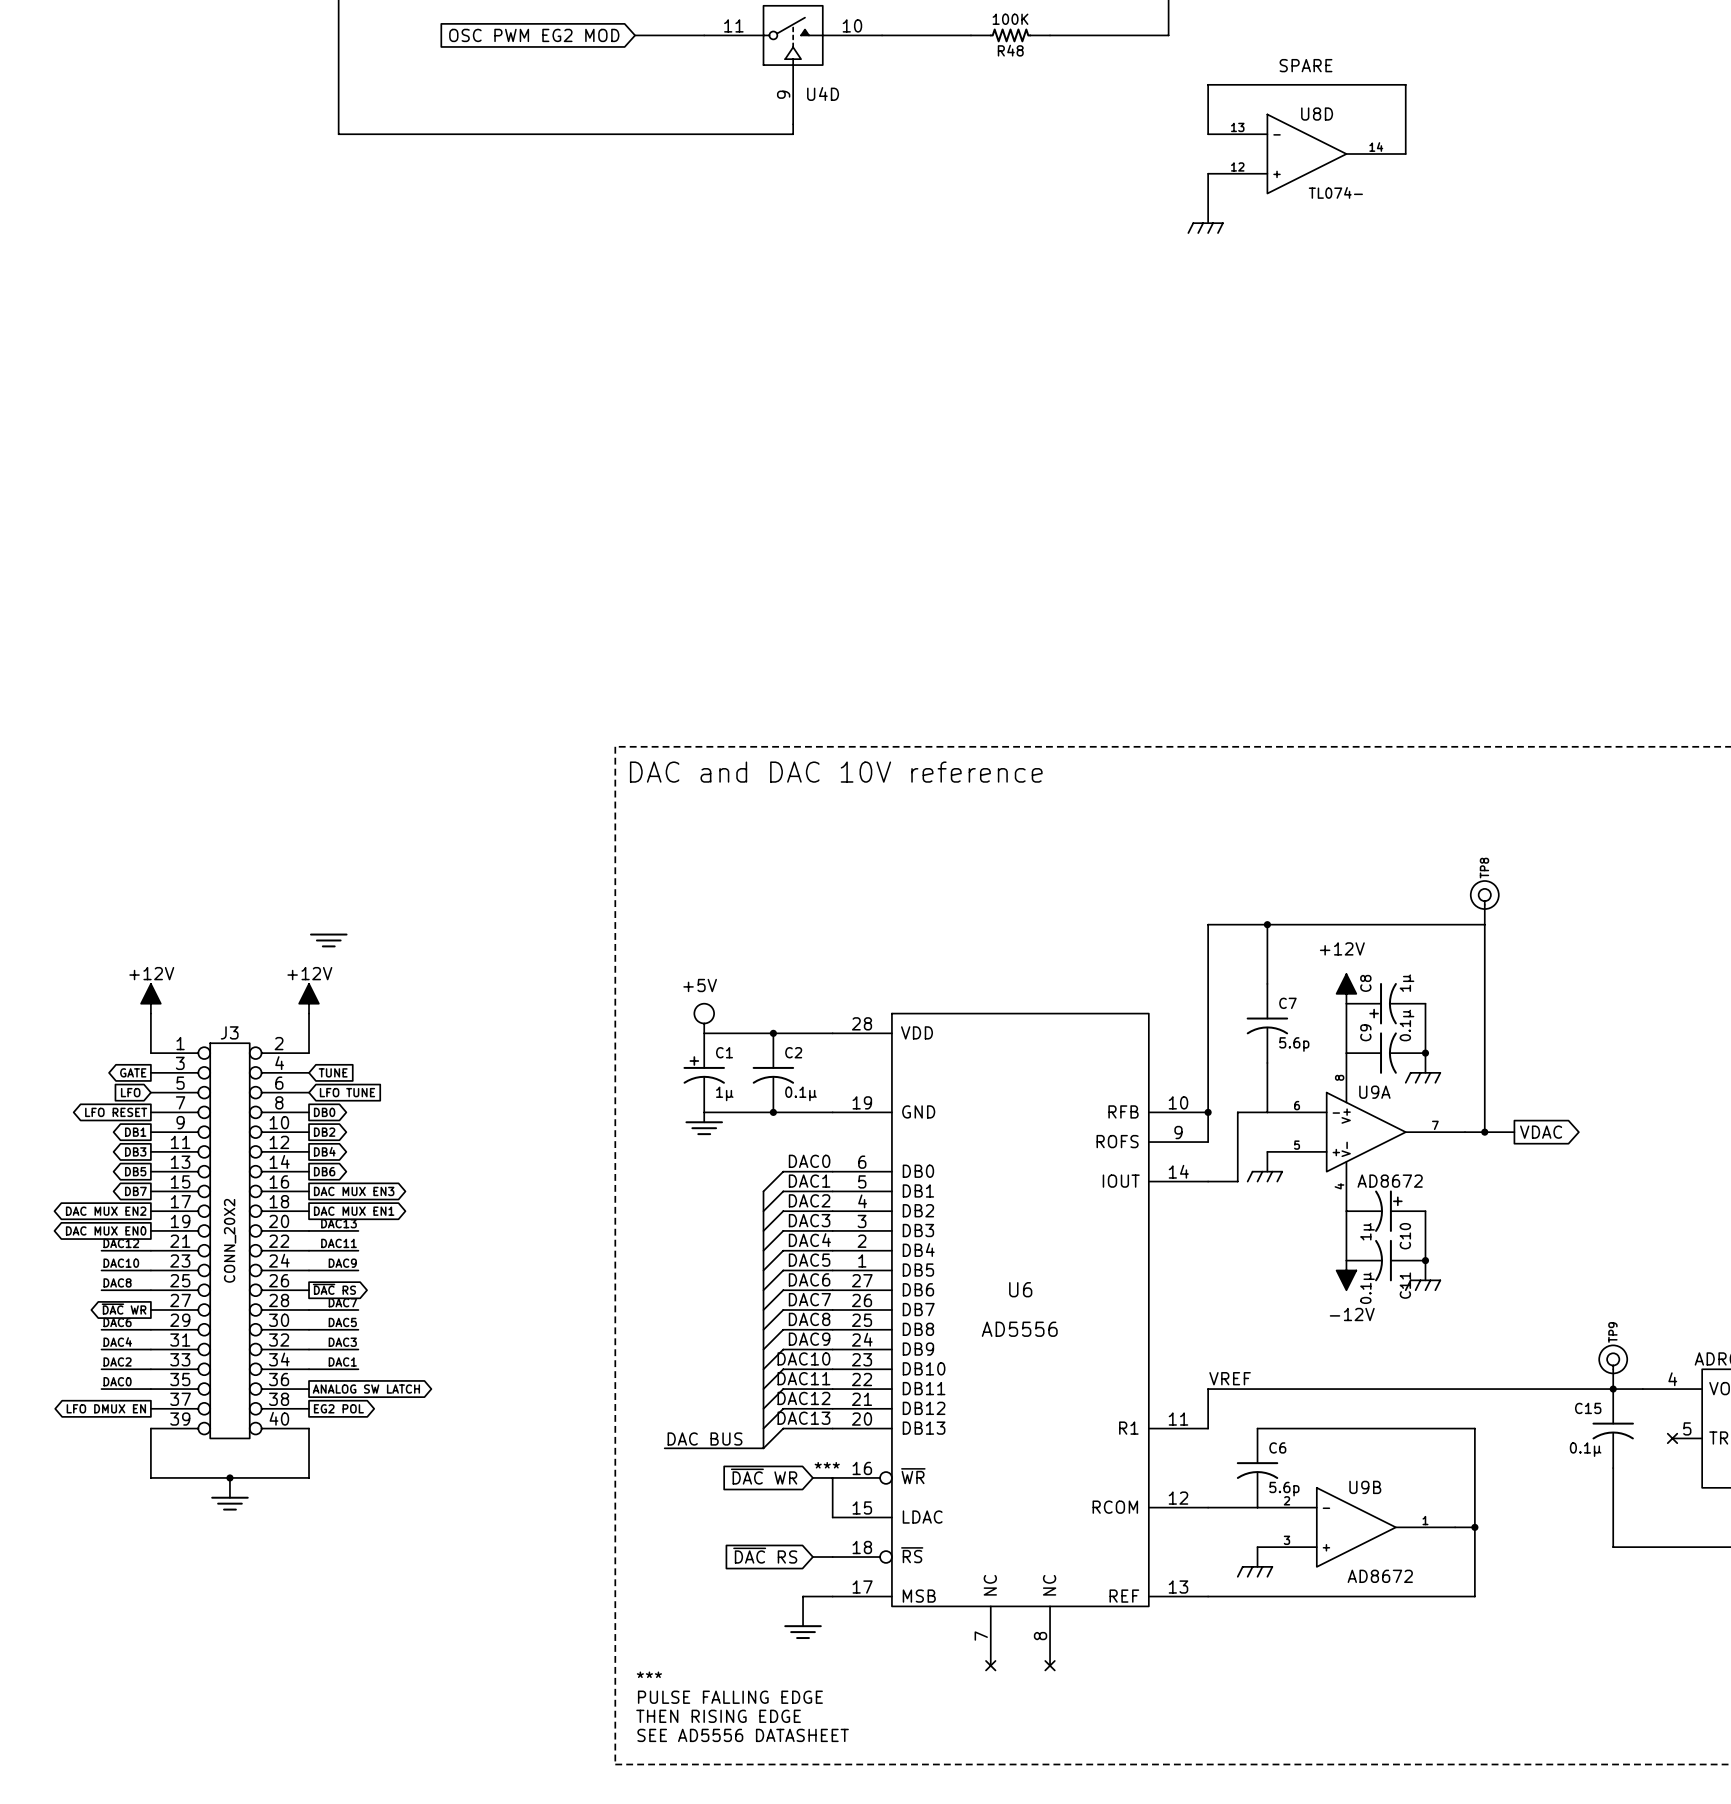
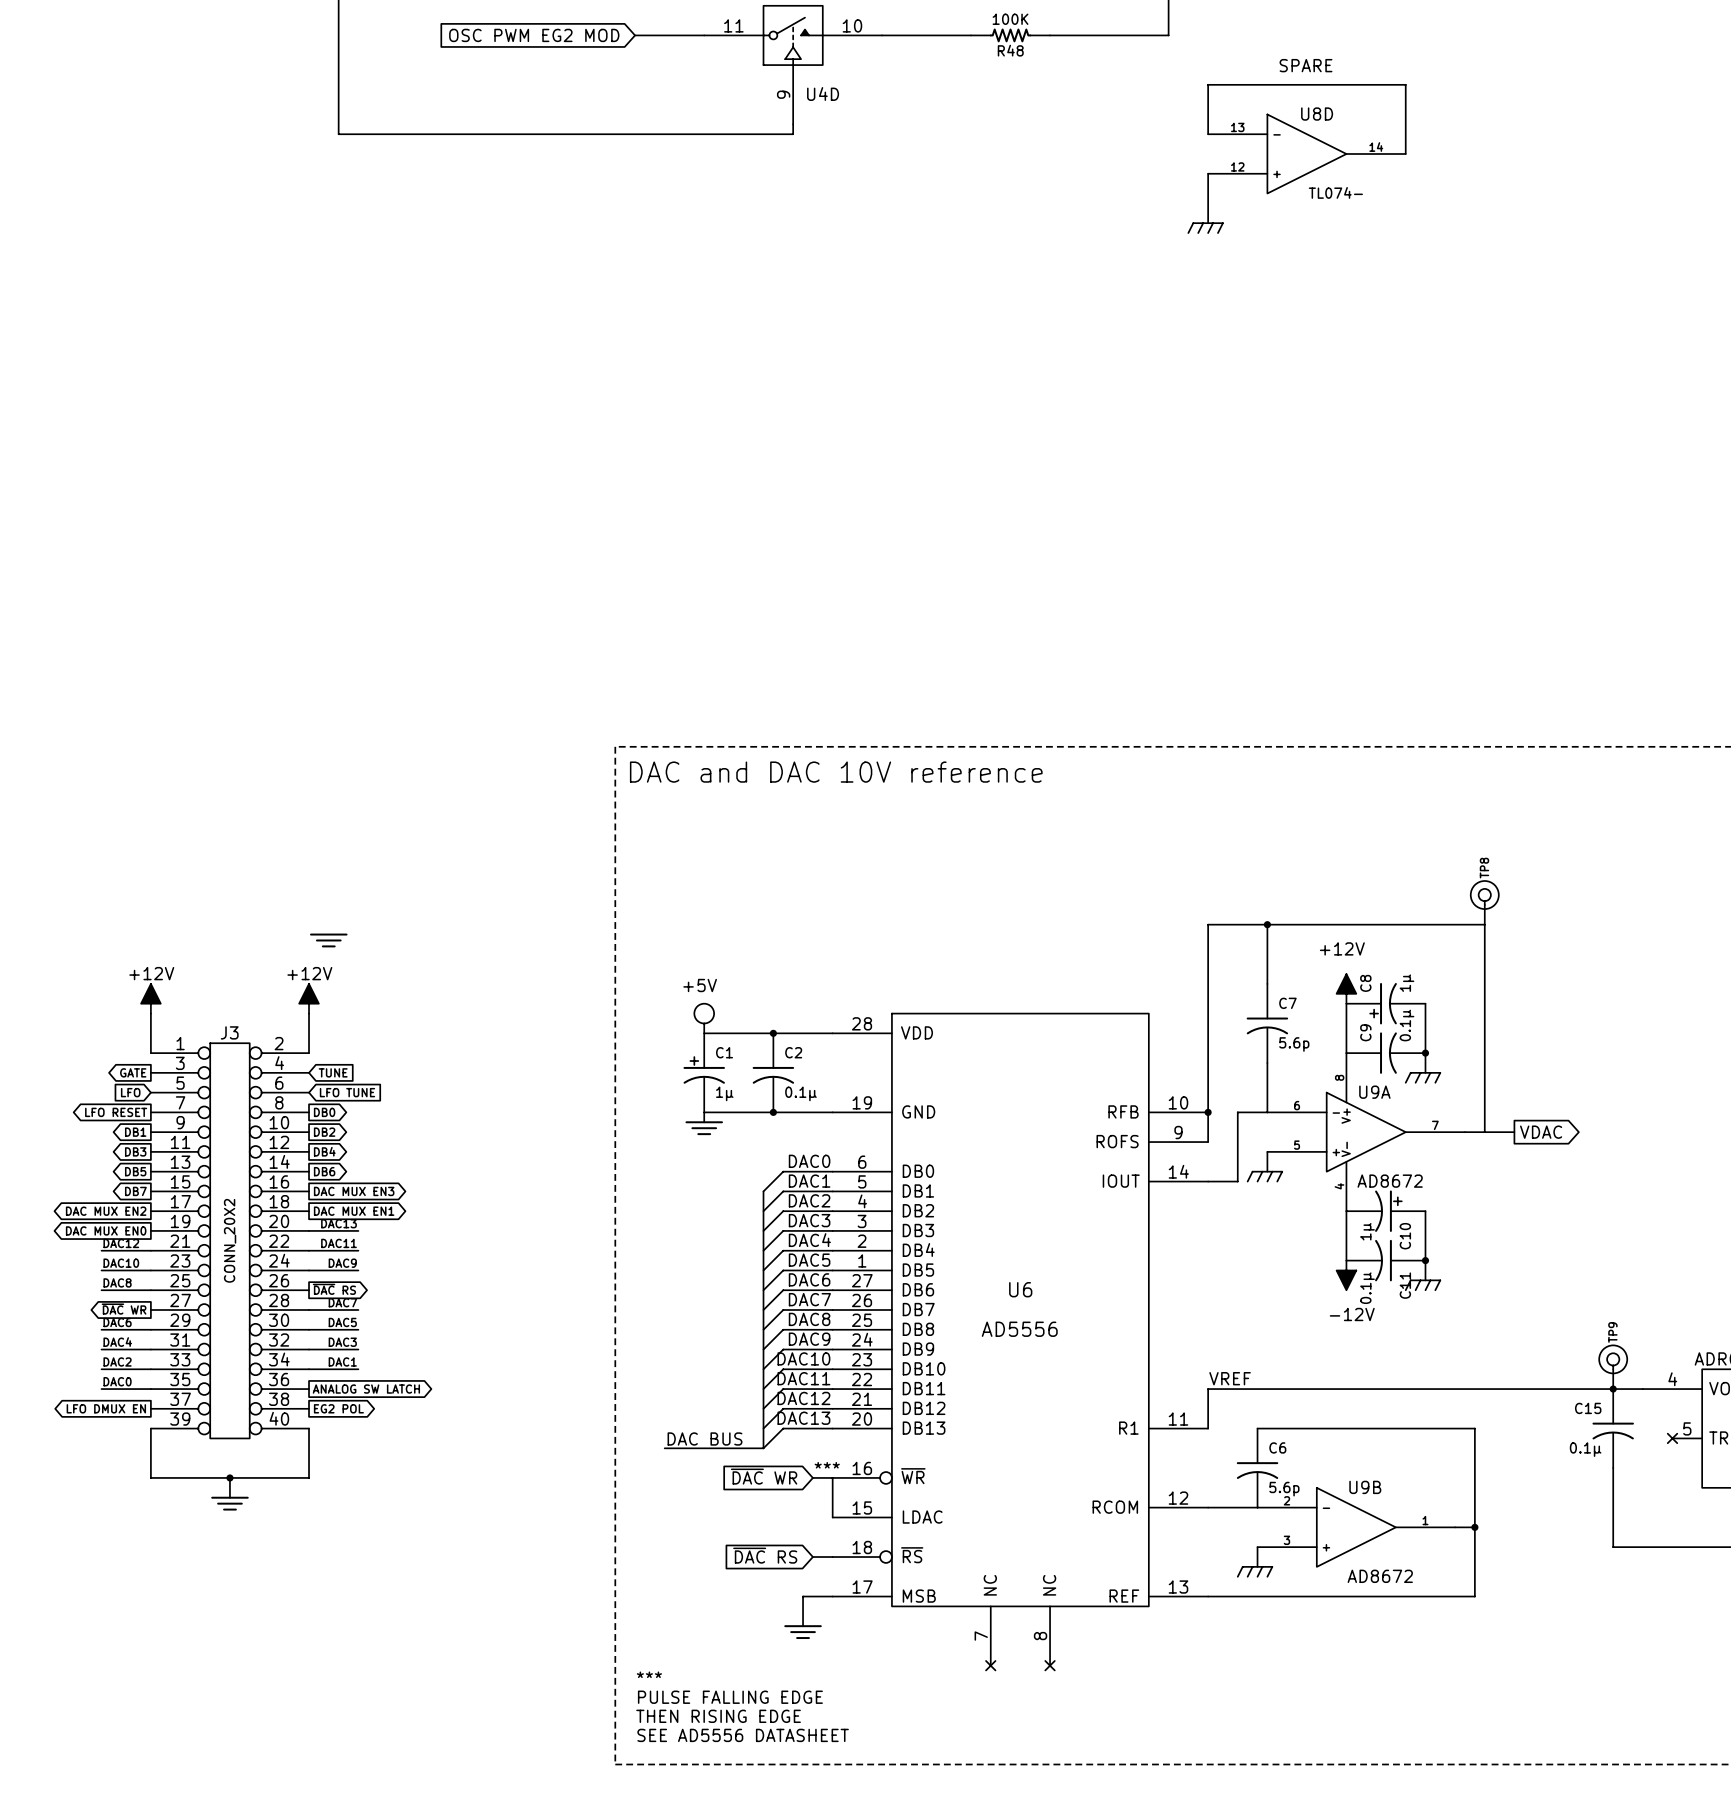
junction: (1484, 1132) -> none

